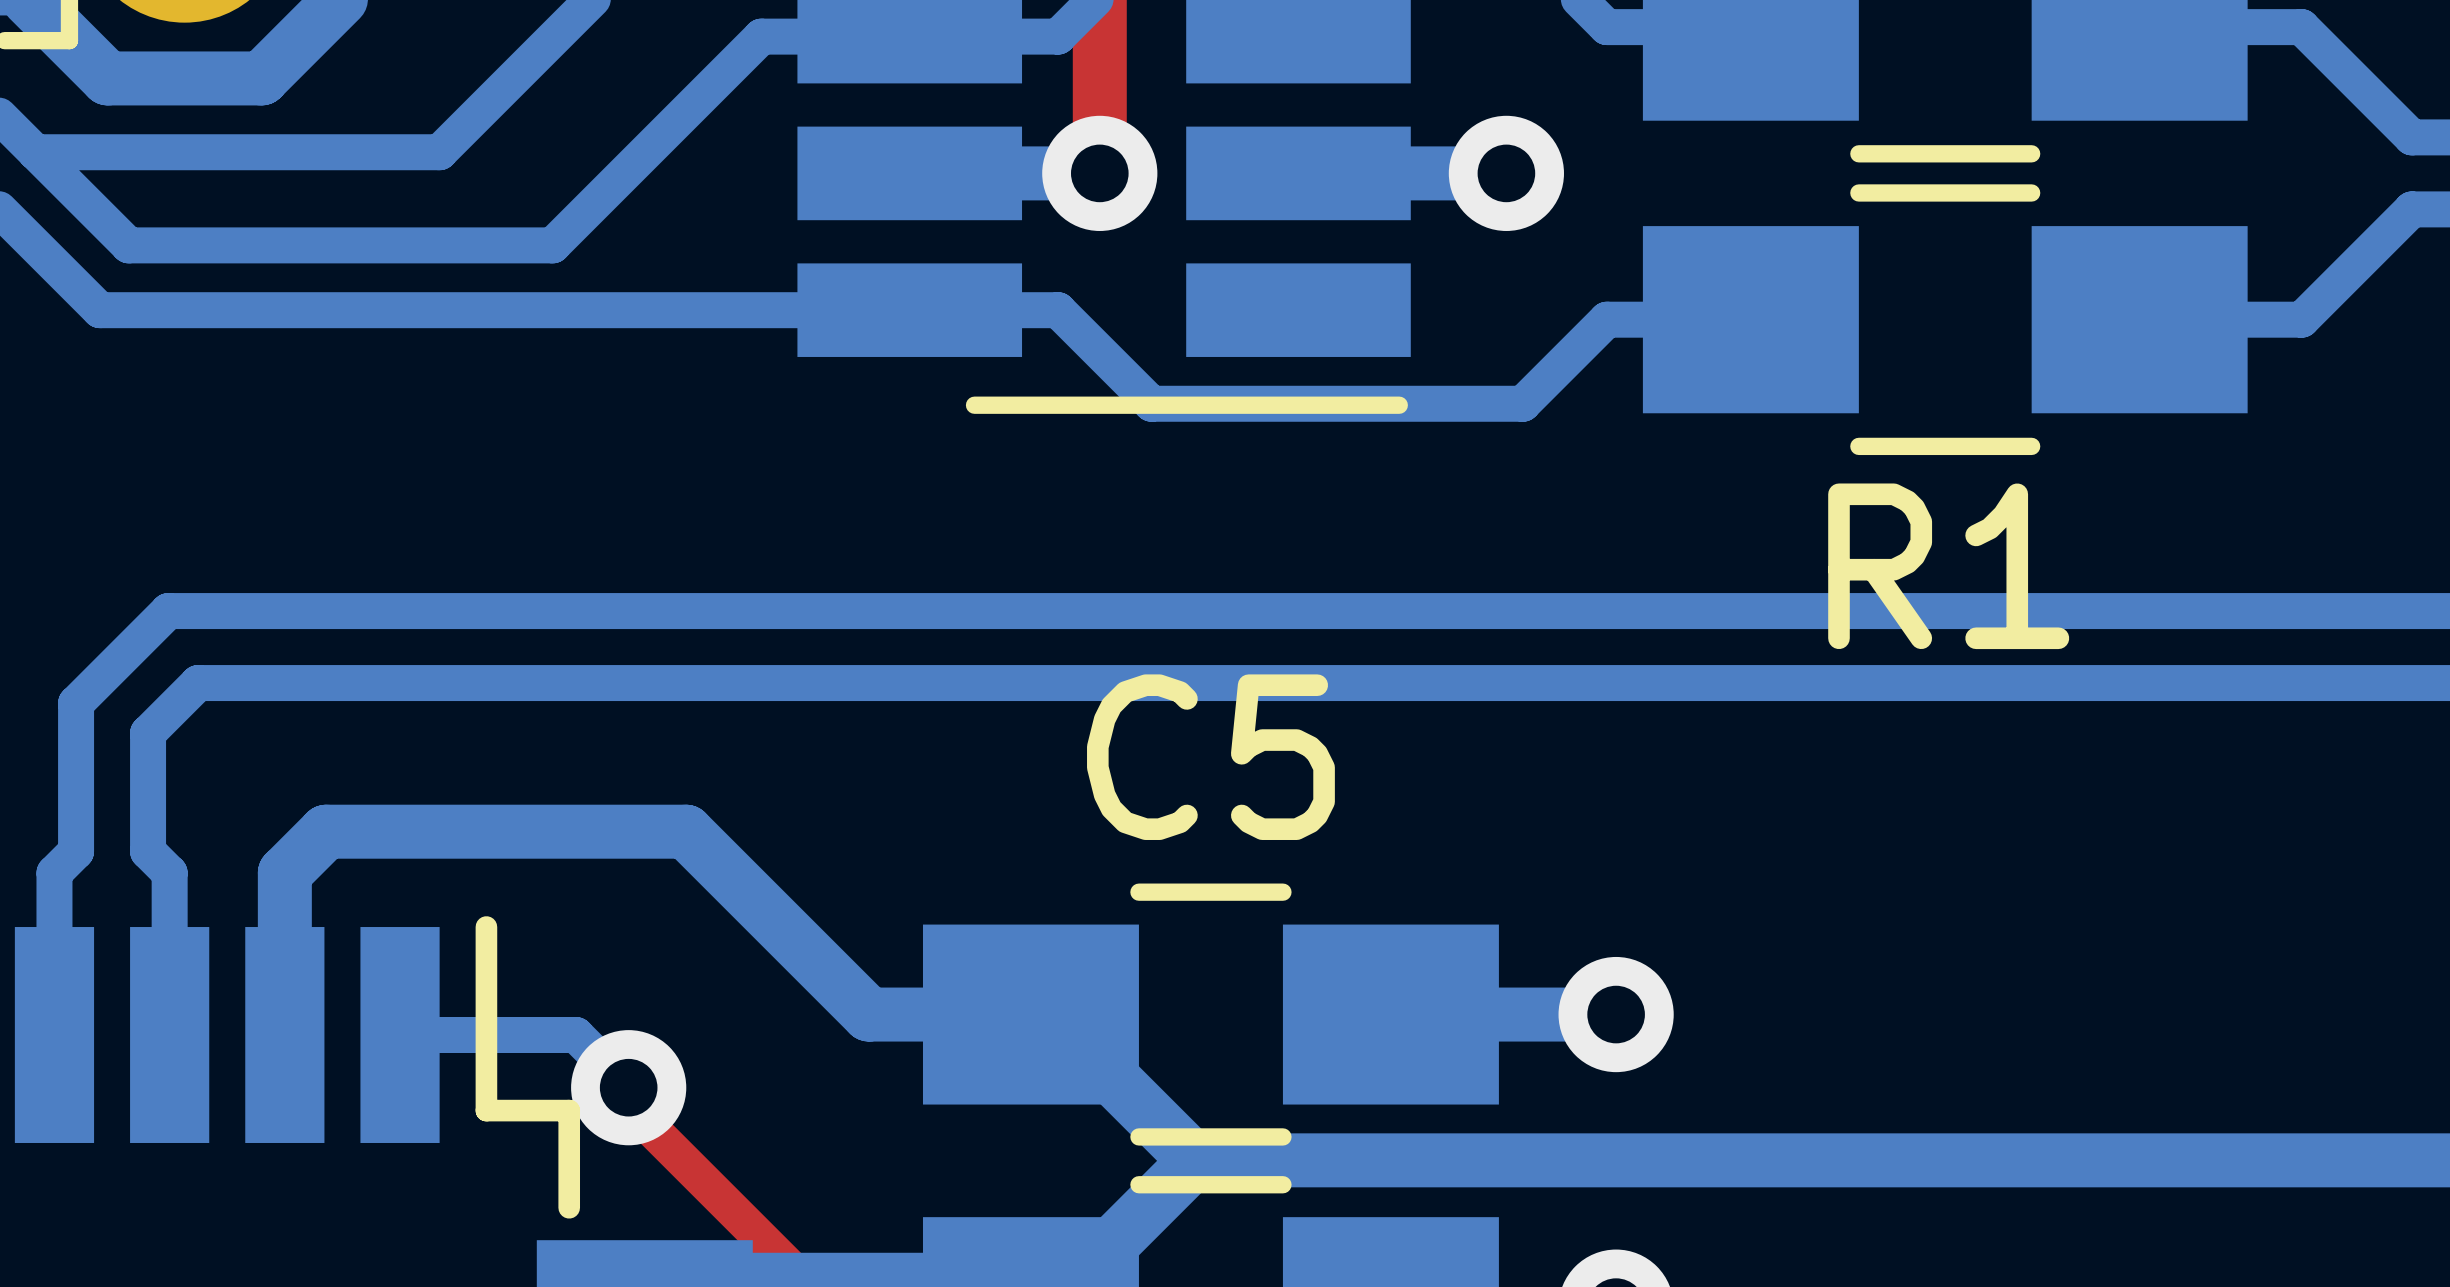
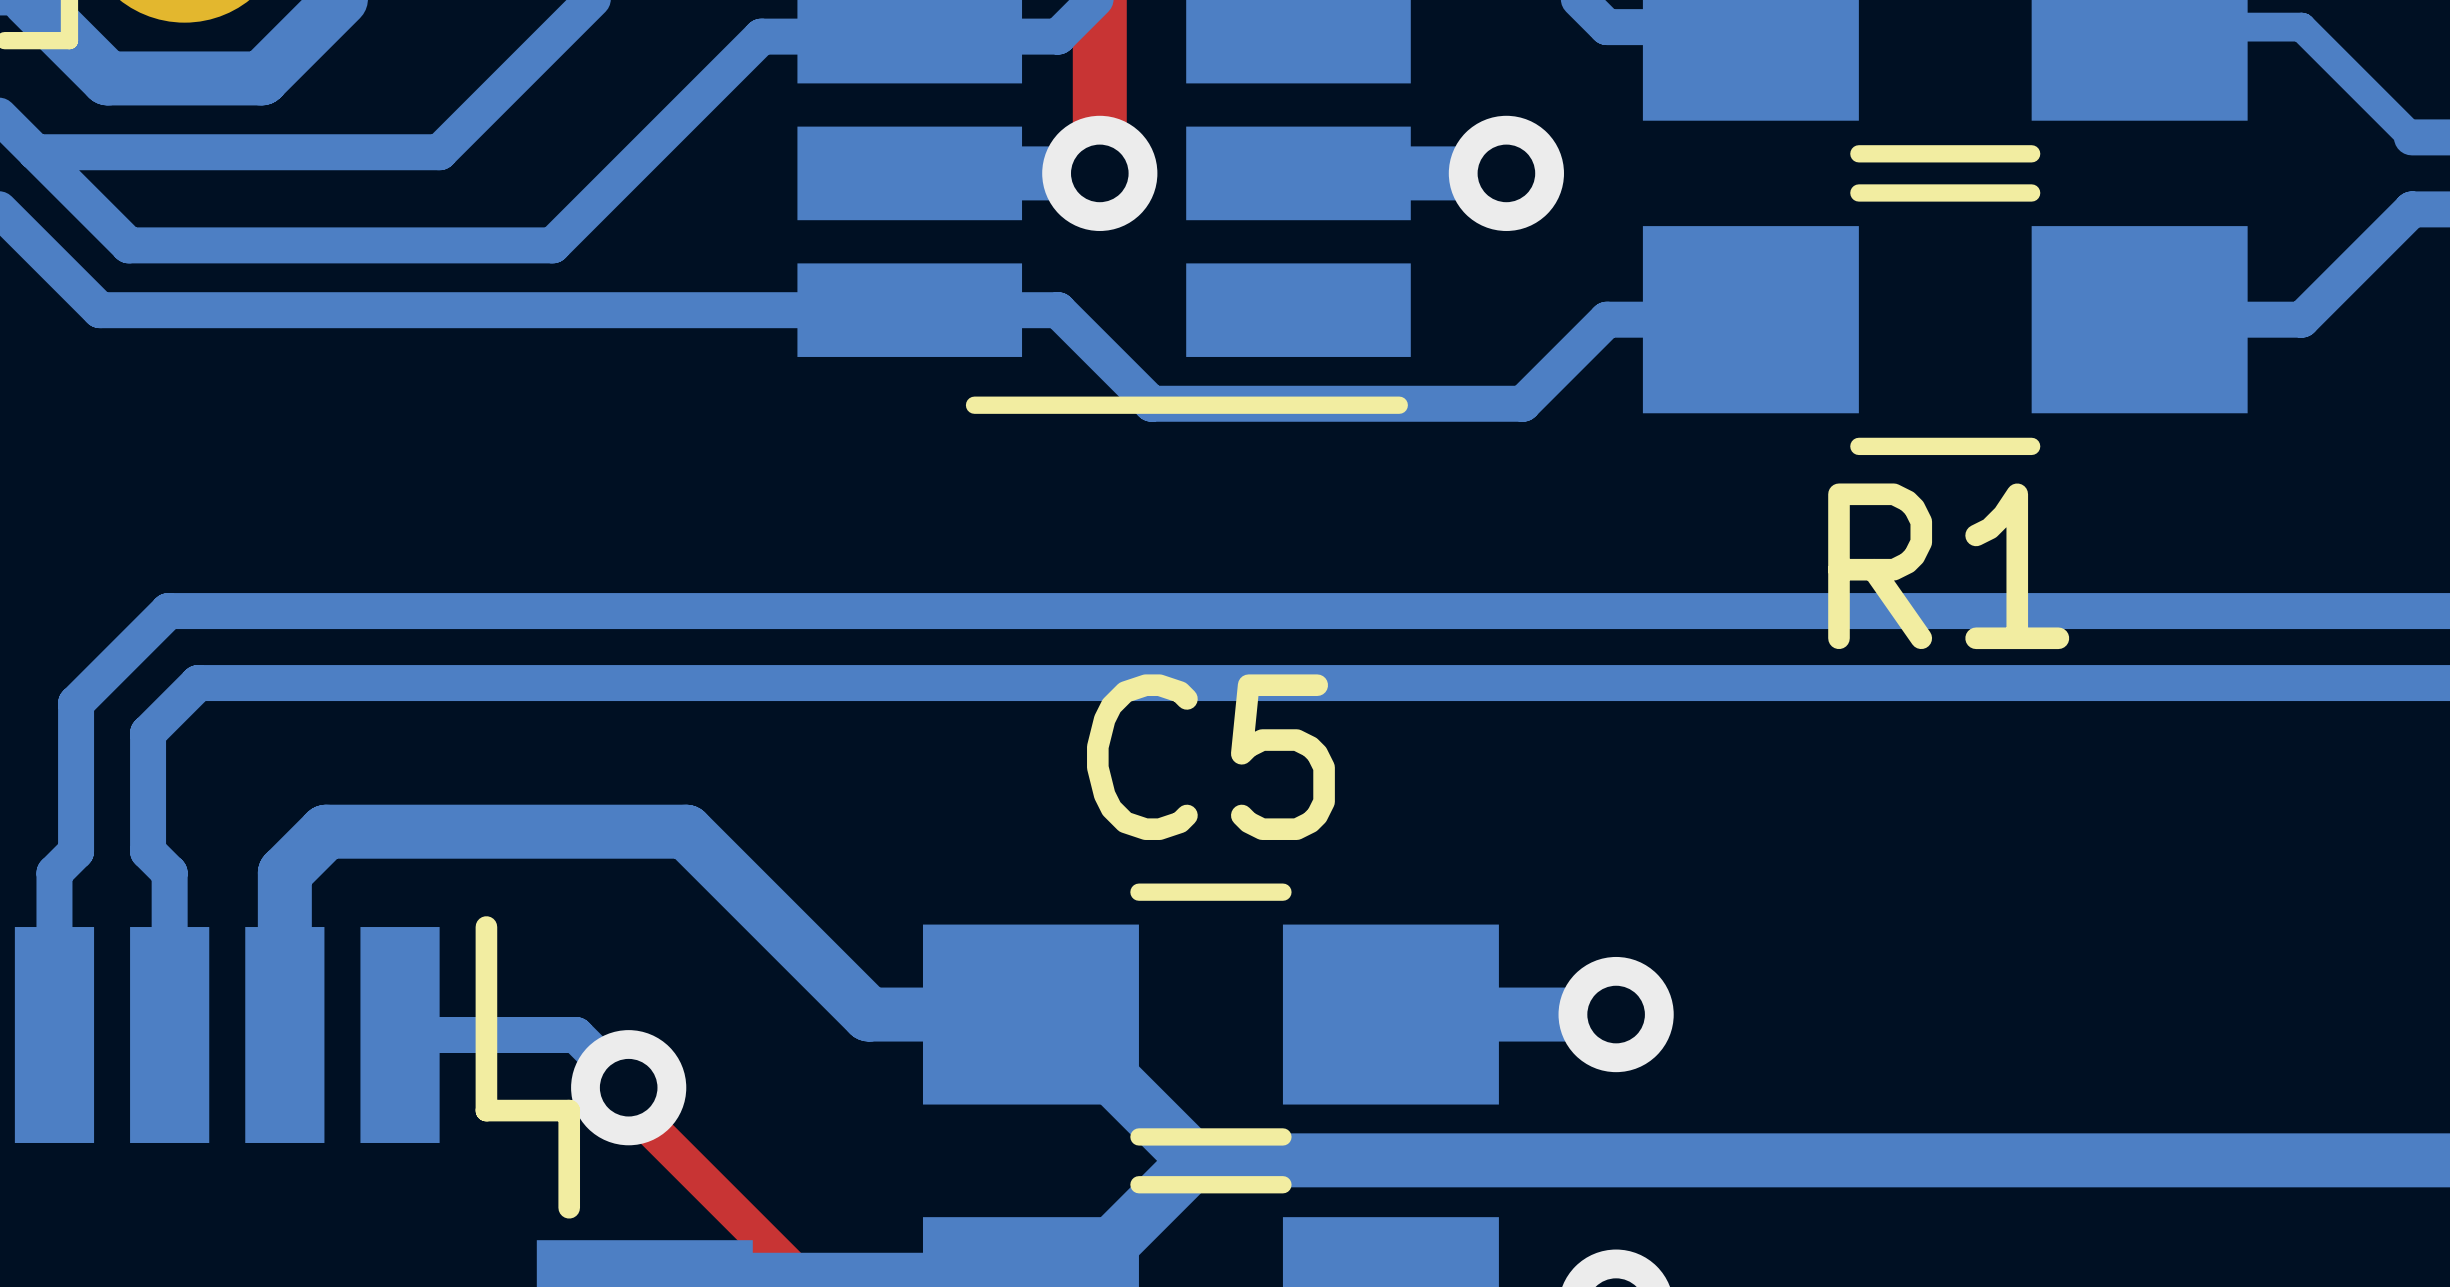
bottom track width: thick (2139, 27) (2301, 27) (2411, 137) -> thin (2139, 27) (2301, 27) (2411, 137)

